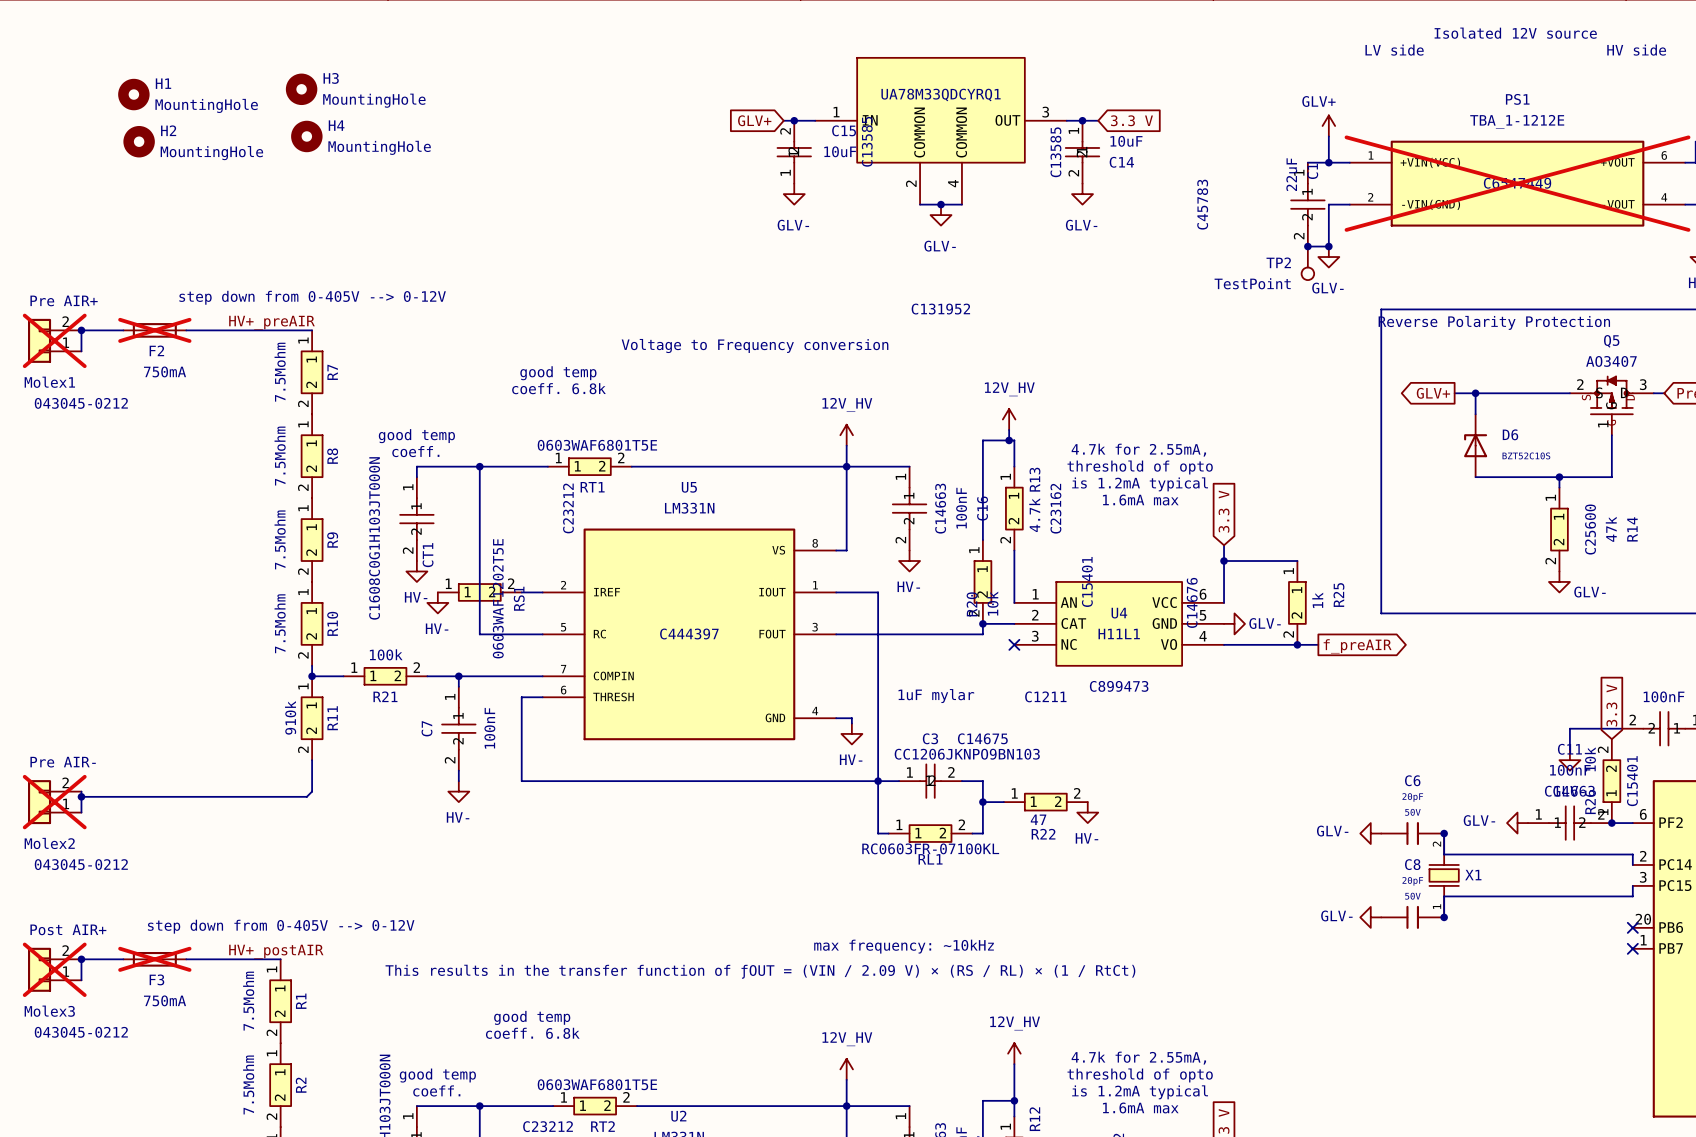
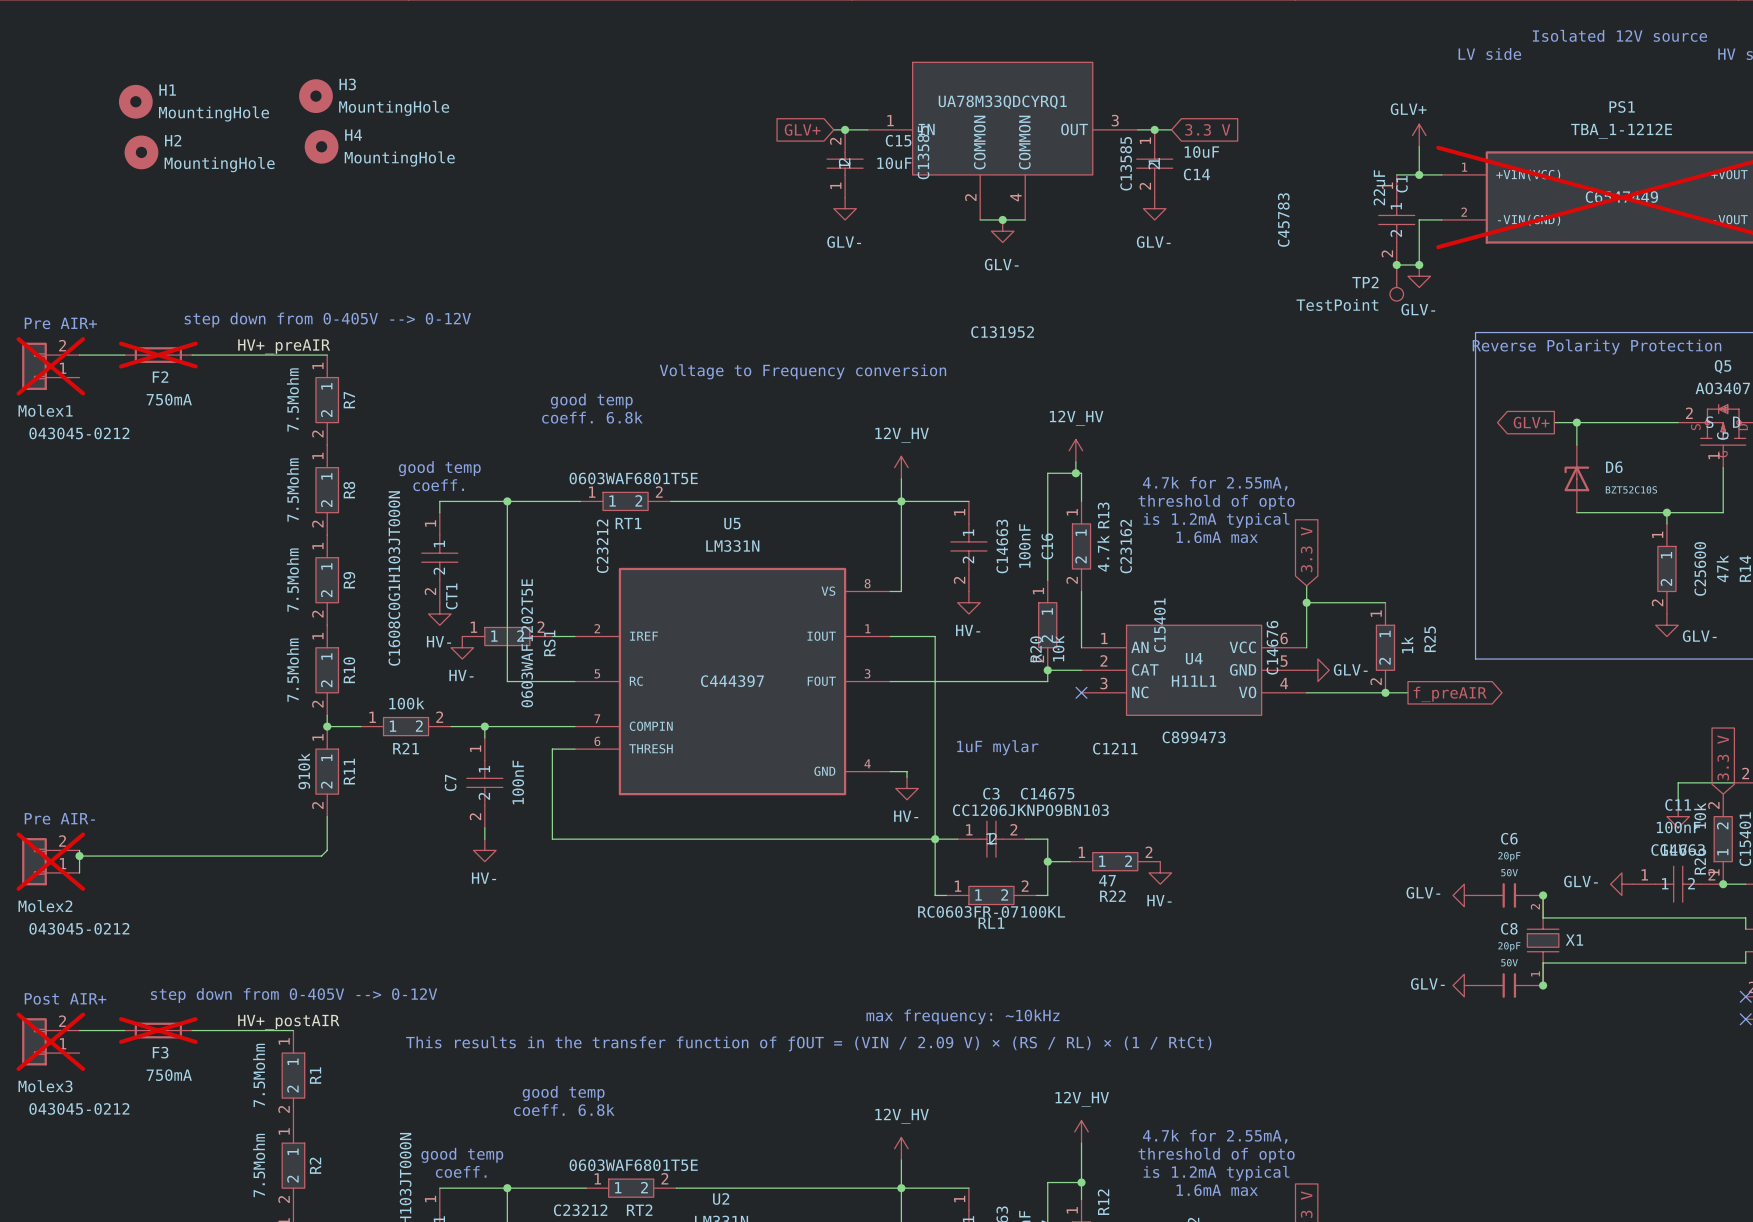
wire: (81, 330) (81, 351) -> none
junction: (81, 330) -> none
wire: (81, 959) (81, 980) -> none
junction: (81, 959) -> none

